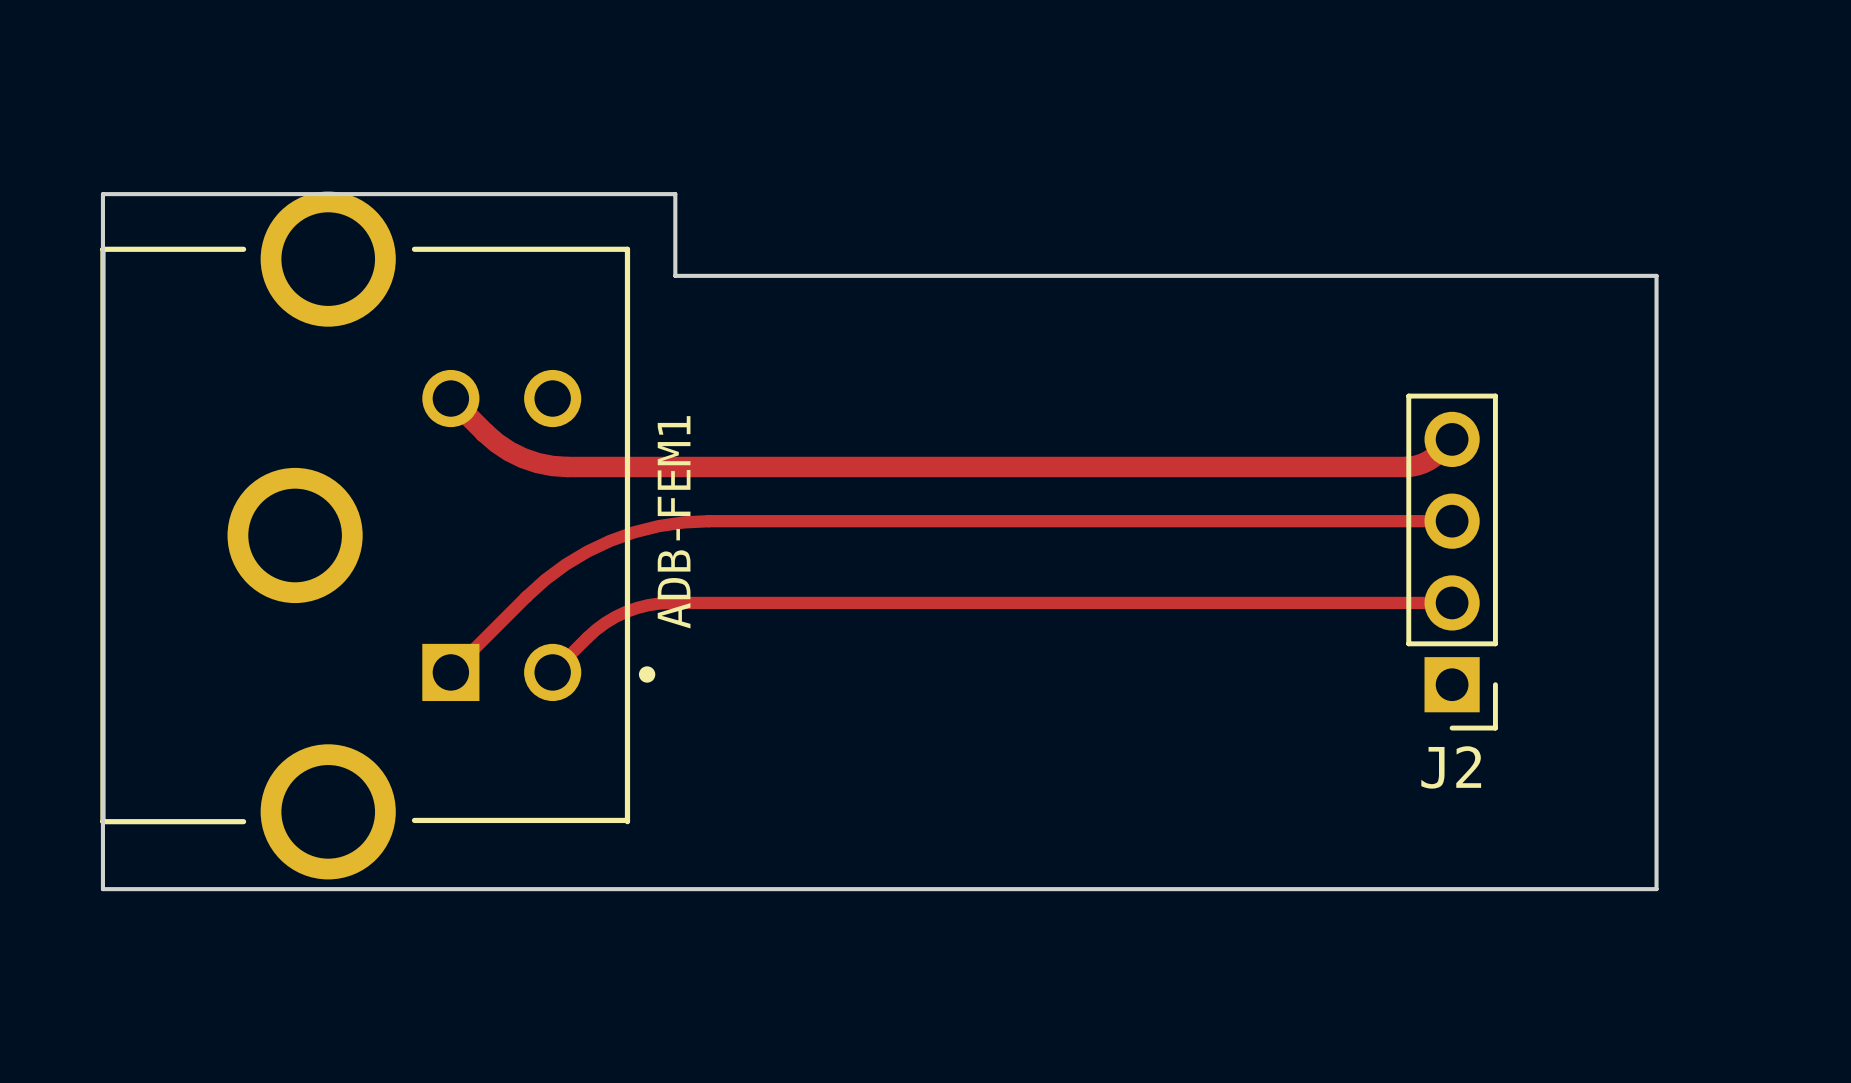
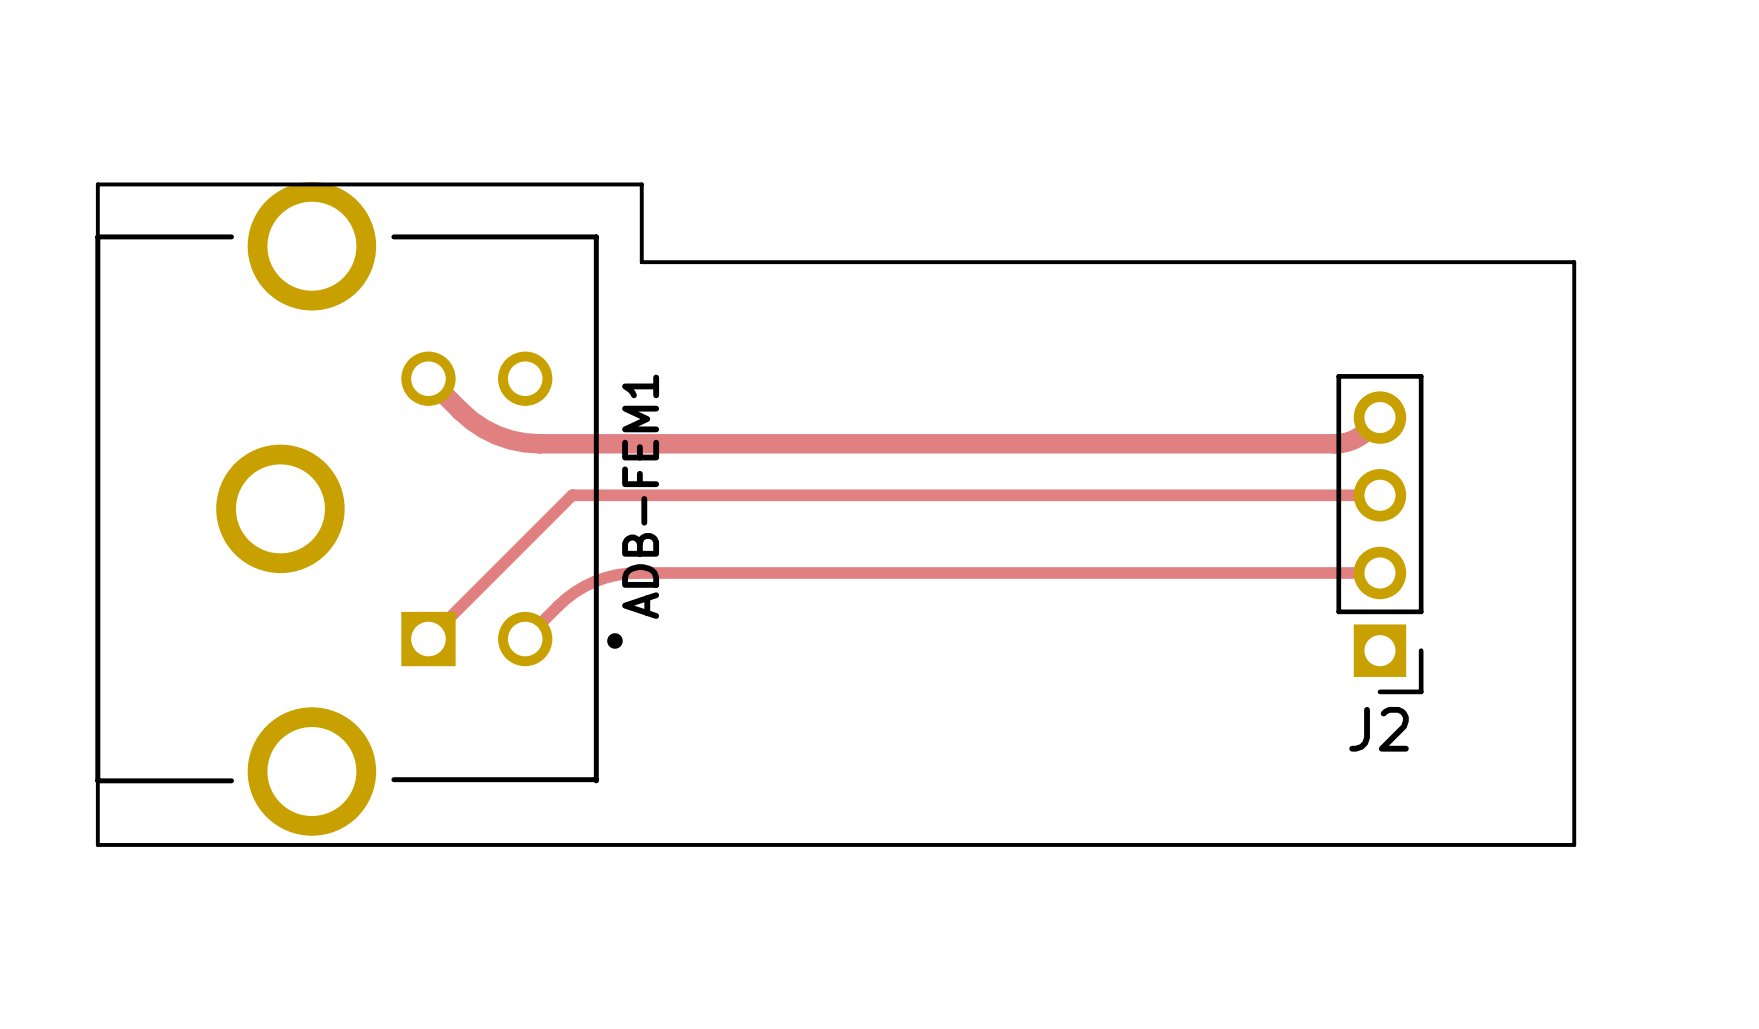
track: (709, 521) (658, 526) (610, 540) (565, 564) (526, 596) -> (673, 495) (572, 495) (500, 567)

